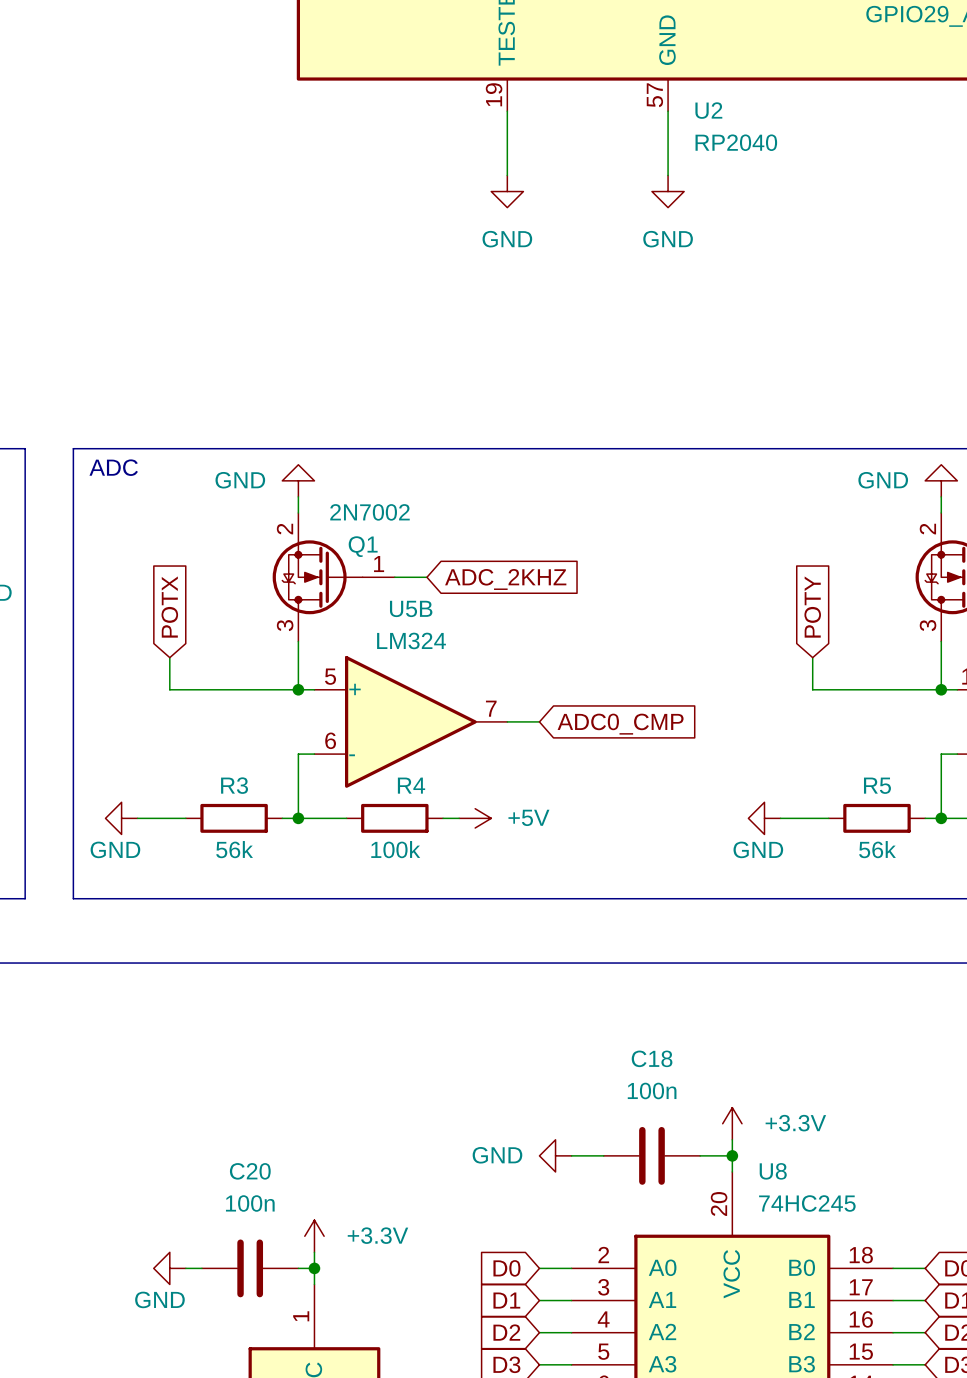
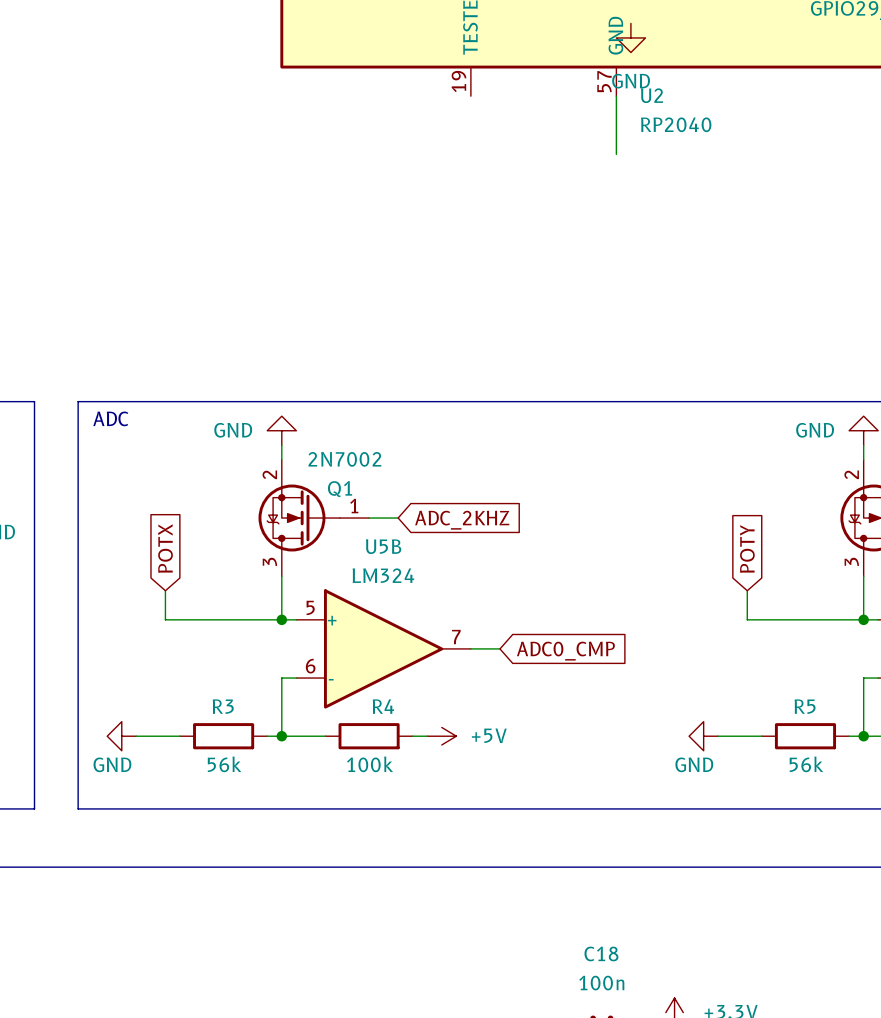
power symbol: none -> GND (630, 37)
wire: (507, 111) (507, 175) -> none
power symbol: GND (507, 191) -> none
power symbol: GND (668, 191) -> none

